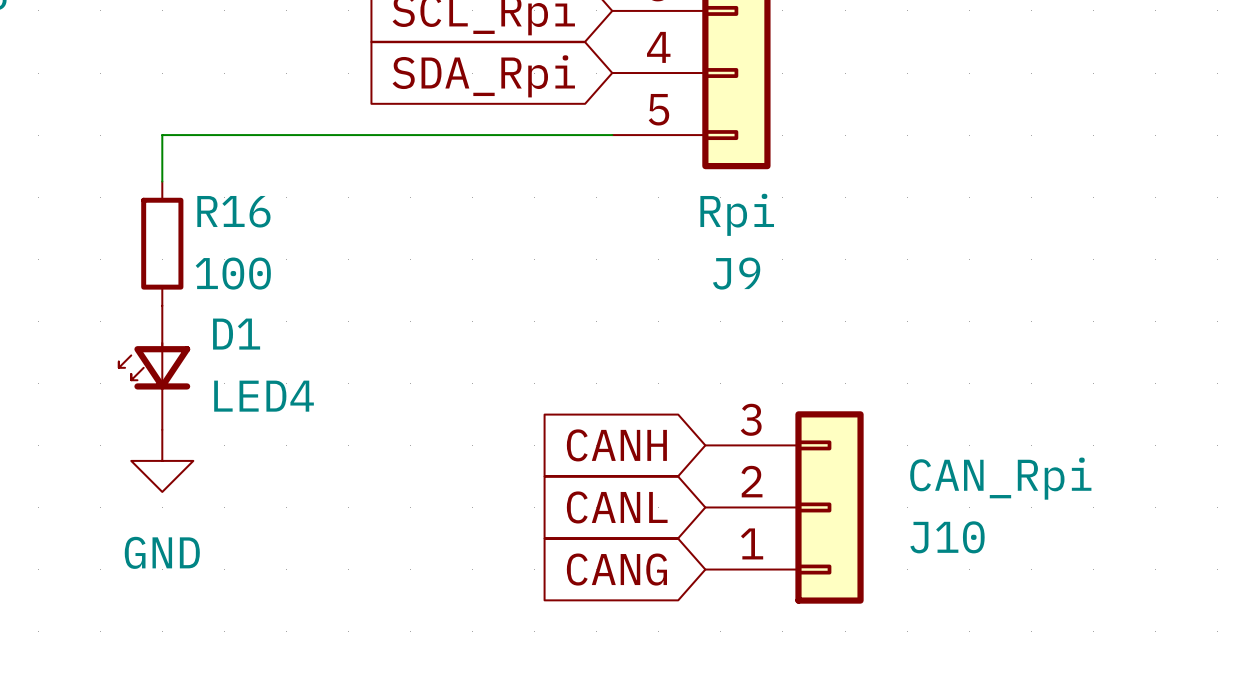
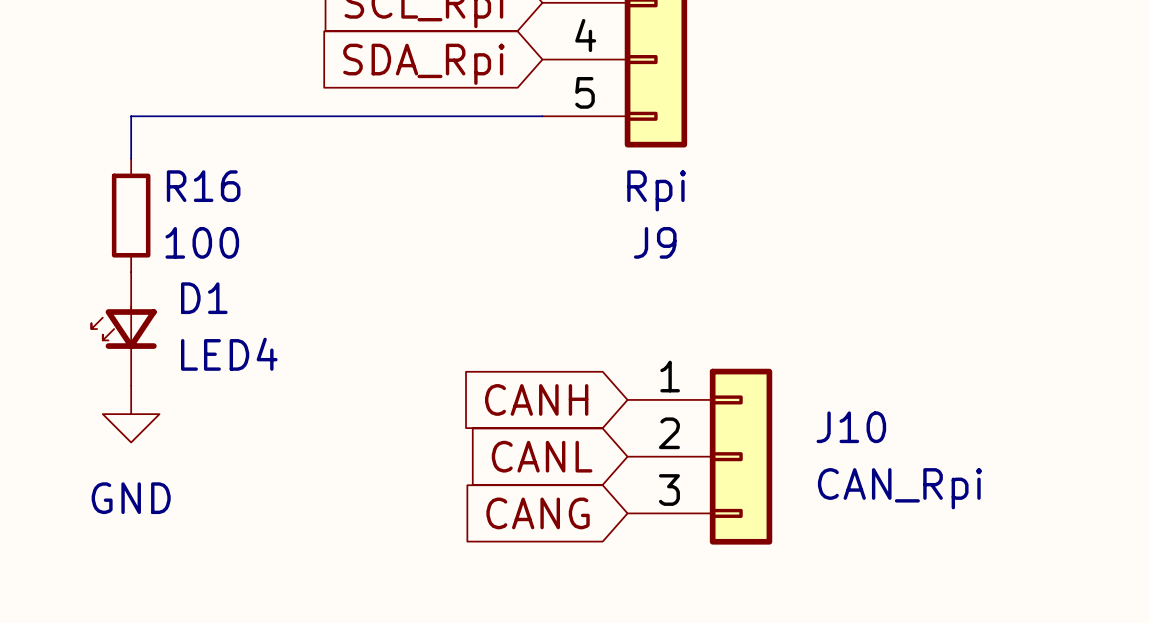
J10 flip: as is (829, 507) -> up-down (741, 456)

